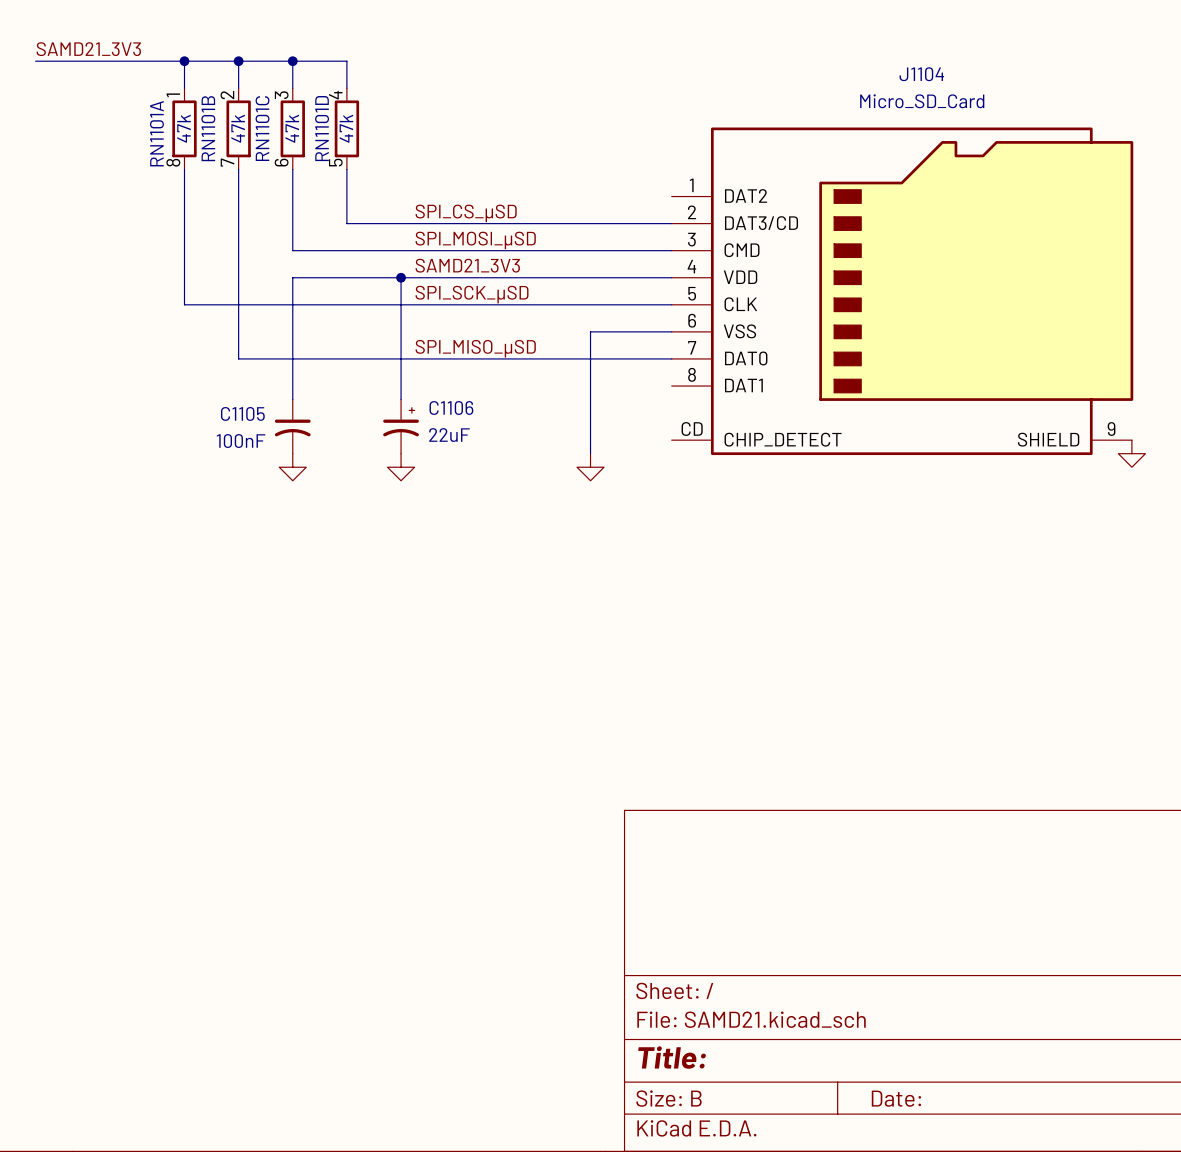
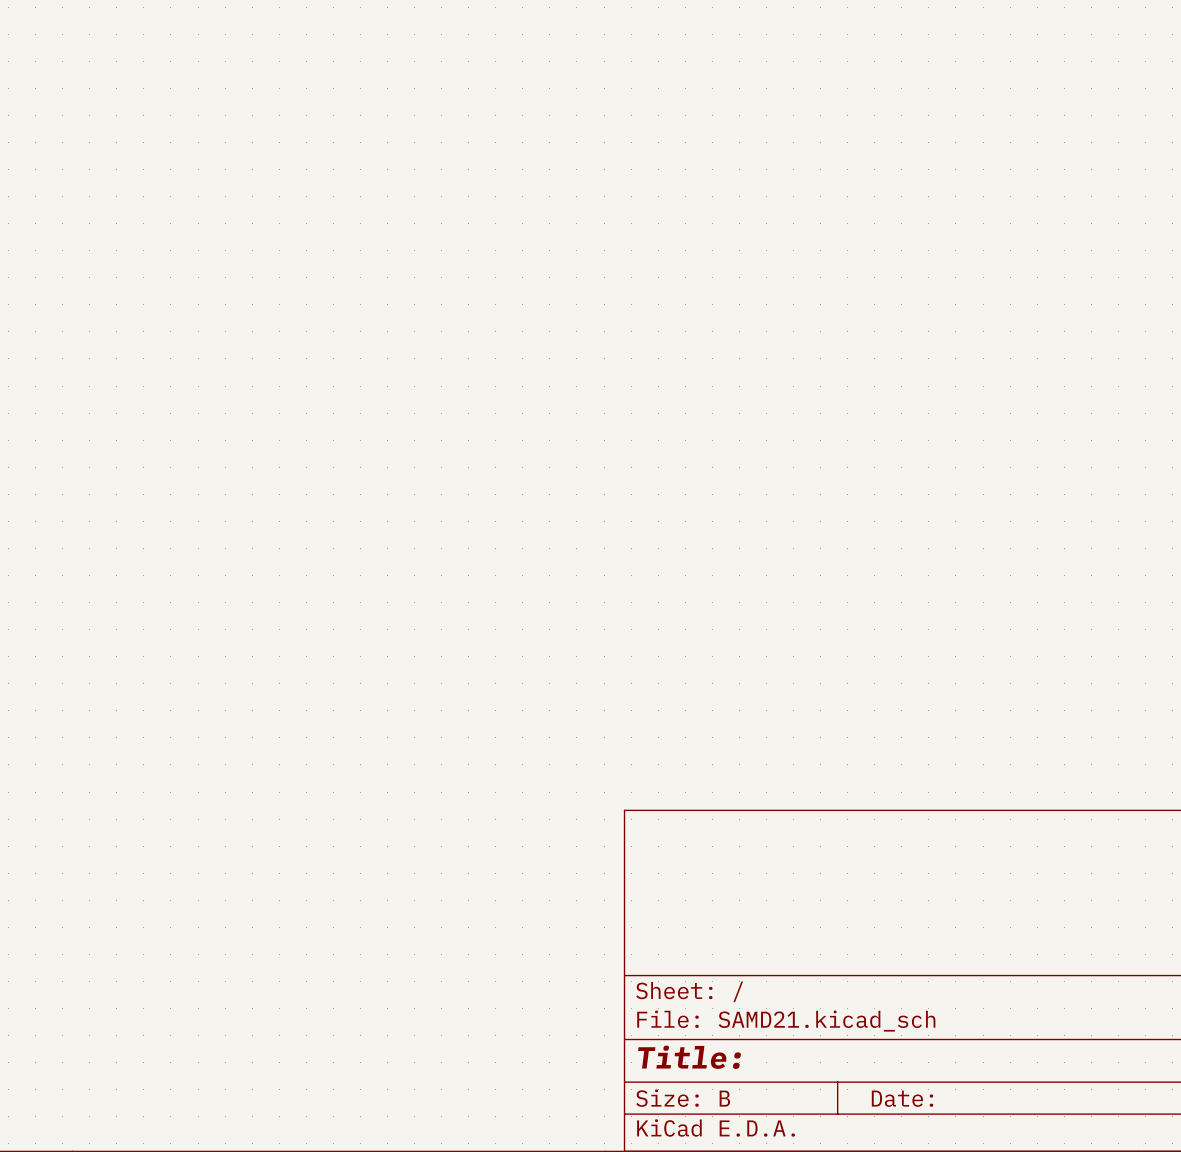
label: SAMD21_3V3 (88, 49) -> none
wire: (35, 61) (346, 61) (346, 88) -> none
wire: (184, 61) (184, 88) -> none
junction: (184, 61) -> none
wire: (238, 61) (238, 88) -> none
junction: (238, 61) -> none
wire: (292, 61) (292, 88) -> none
junction: (292, 61) -> none
RN1101A: 47k (184, 128) -> none
RN1101B: 47k (238, 128) -> none
RN1101C: 47k (292, 128) -> none
RN1101D: 47k (346, 128) -> none
wire: (184, 169) (184, 304) (671, 304) -> none
wire: (238, 169) (238, 358) (671, 358) -> none
wire: (292, 169) (292, 250) (671, 250) -> none
wire: (346, 169) (346, 223) (671, 223) -> none
label: SPI_CS_µSD (466, 213) -> none
label: SPI_MOSI_µSD (475, 240) -> none
label: SAMD21_3V3 (467, 265) -> none
wire: (401, 277) (401, 399) -> none
junction: (401, 277) -> none
wire: (671, 277) (292, 277) (292, 399) -> none
J1104: Micro_SD_Card (902, 291) -> none
label: SPI_SCK_µSD (472, 294) -> none
wire: (671, 331) (590, 331) (590, 453) -> none
label: SPI_MISO_µSD (475, 348) -> none
C1105: 100nF (292, 426) -> none
C1106: 22uF (401, 426) -> none
power symbol: (1131, 453) -> none
power symbol: (292, 467) -> none
power symbol: (401, 467) -> none
power symbol: (590, 467) -> none

